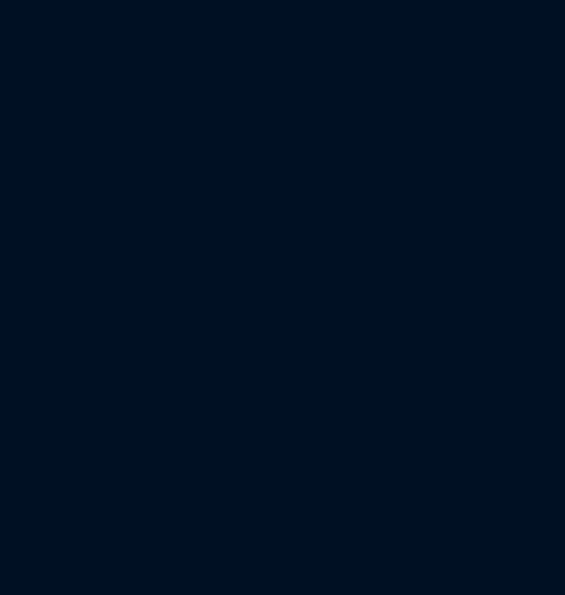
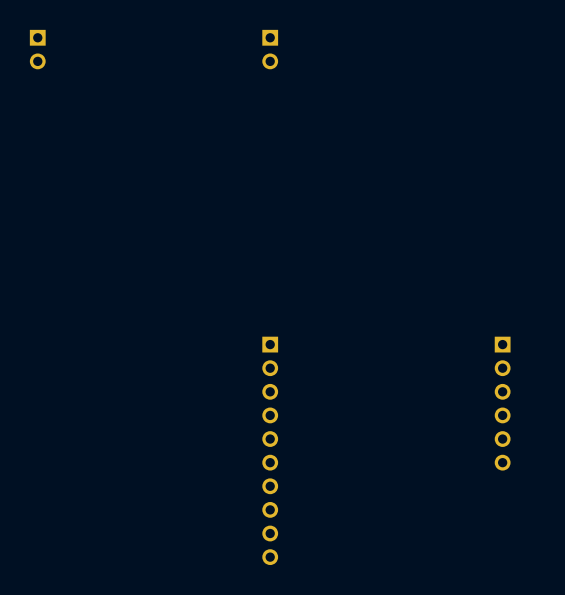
part: none -> (37, 49)
part: none -> (270, 49)
part: none -> (502, 403)
part: none -> (270, 450)

